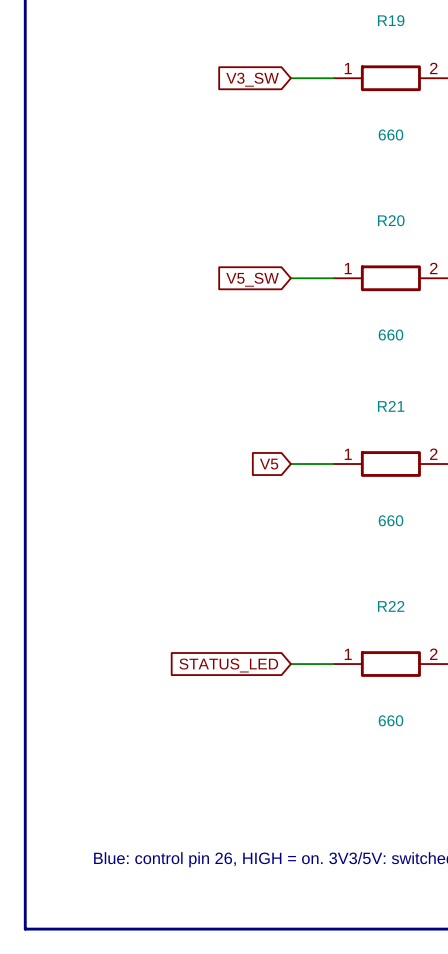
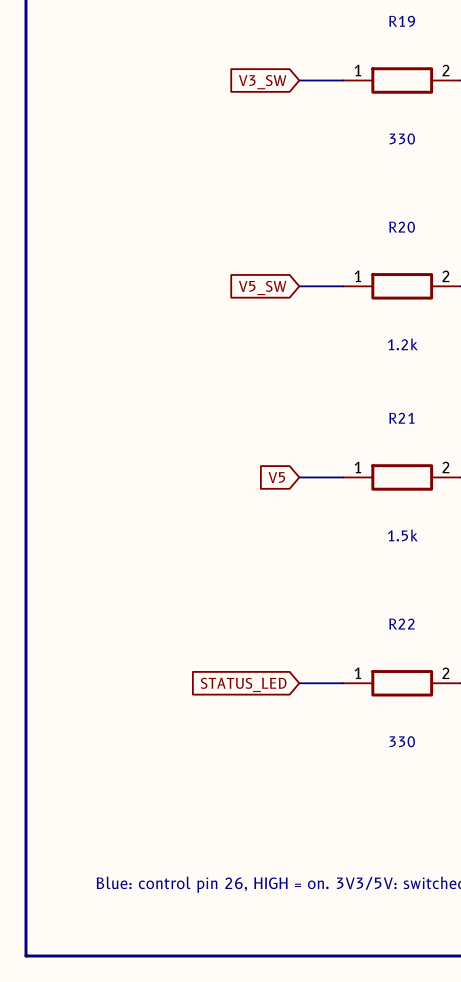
R19 value: 660 (390, 134) -> 330 (402, 138)
R20 value: 660 (390, 335) -> 1.2k (402, 344)
R21 value: 660 (390, 520) -> 1.5k (402, 535)
R22 value: 660 (390, 720) -> 330 (402, 741)

